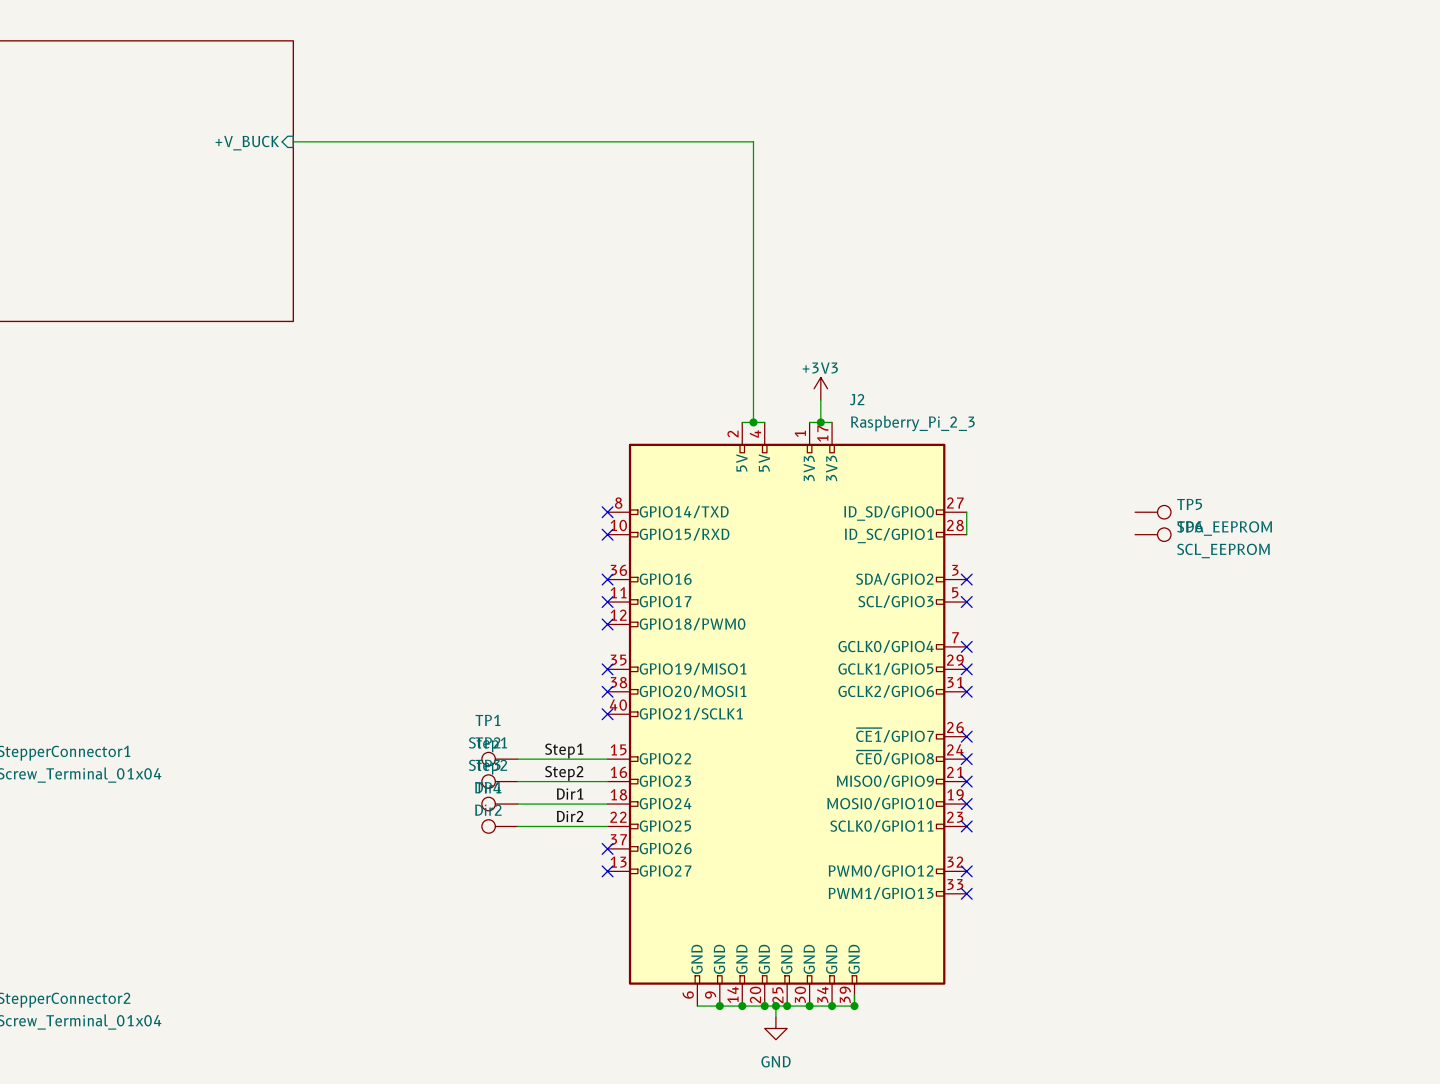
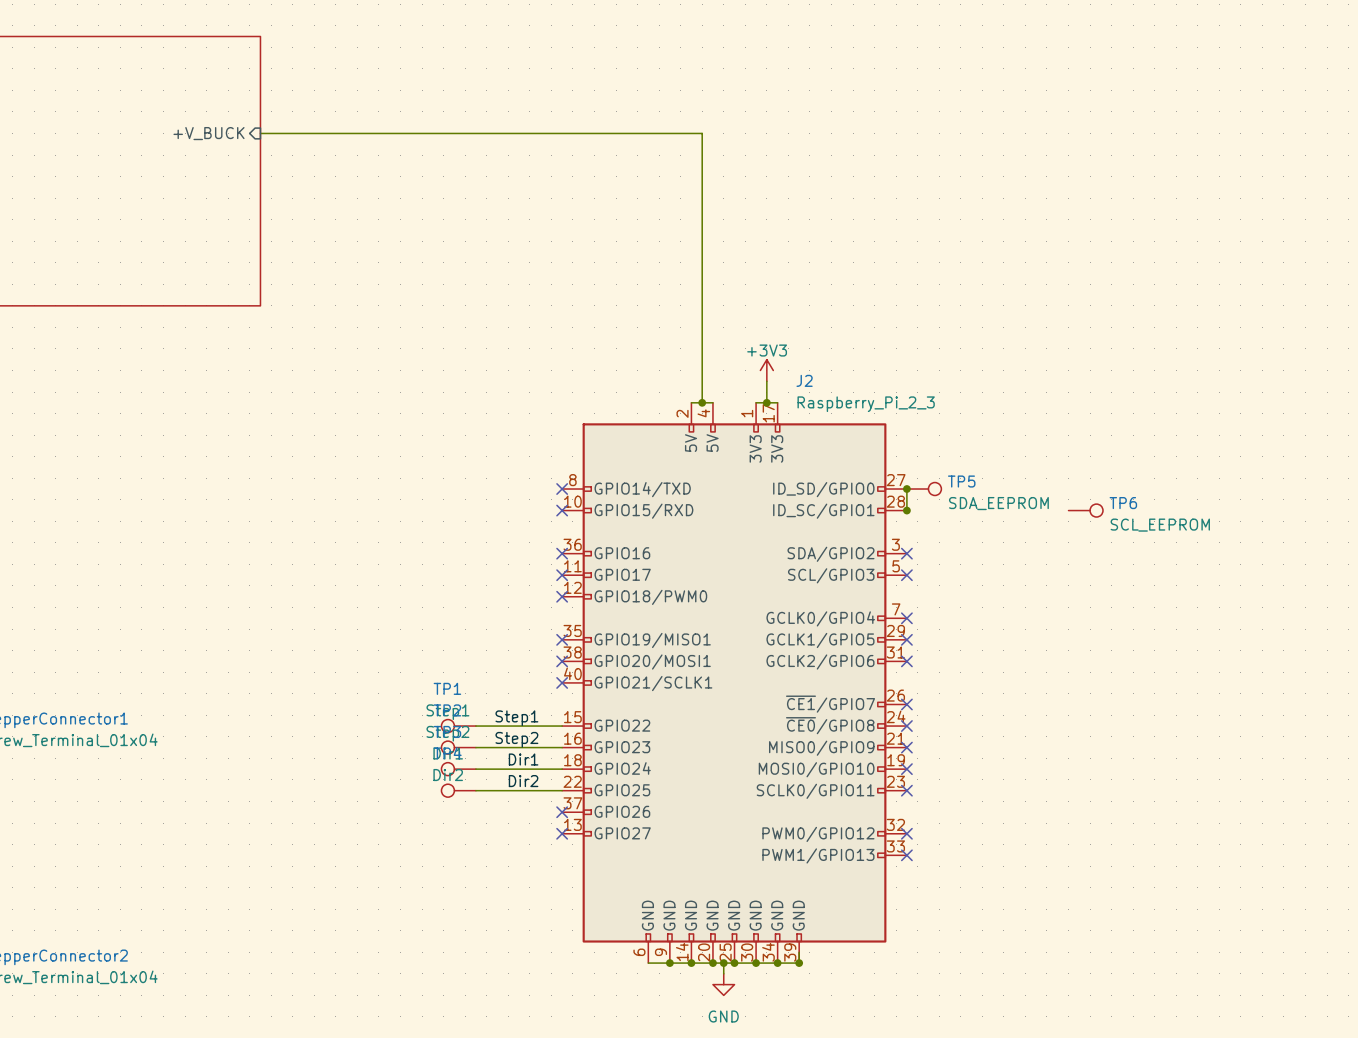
junction: none -> (906, 489)
TP5 position: (1153, 512) -> (924, 489)
junction: none -> (906, 510)

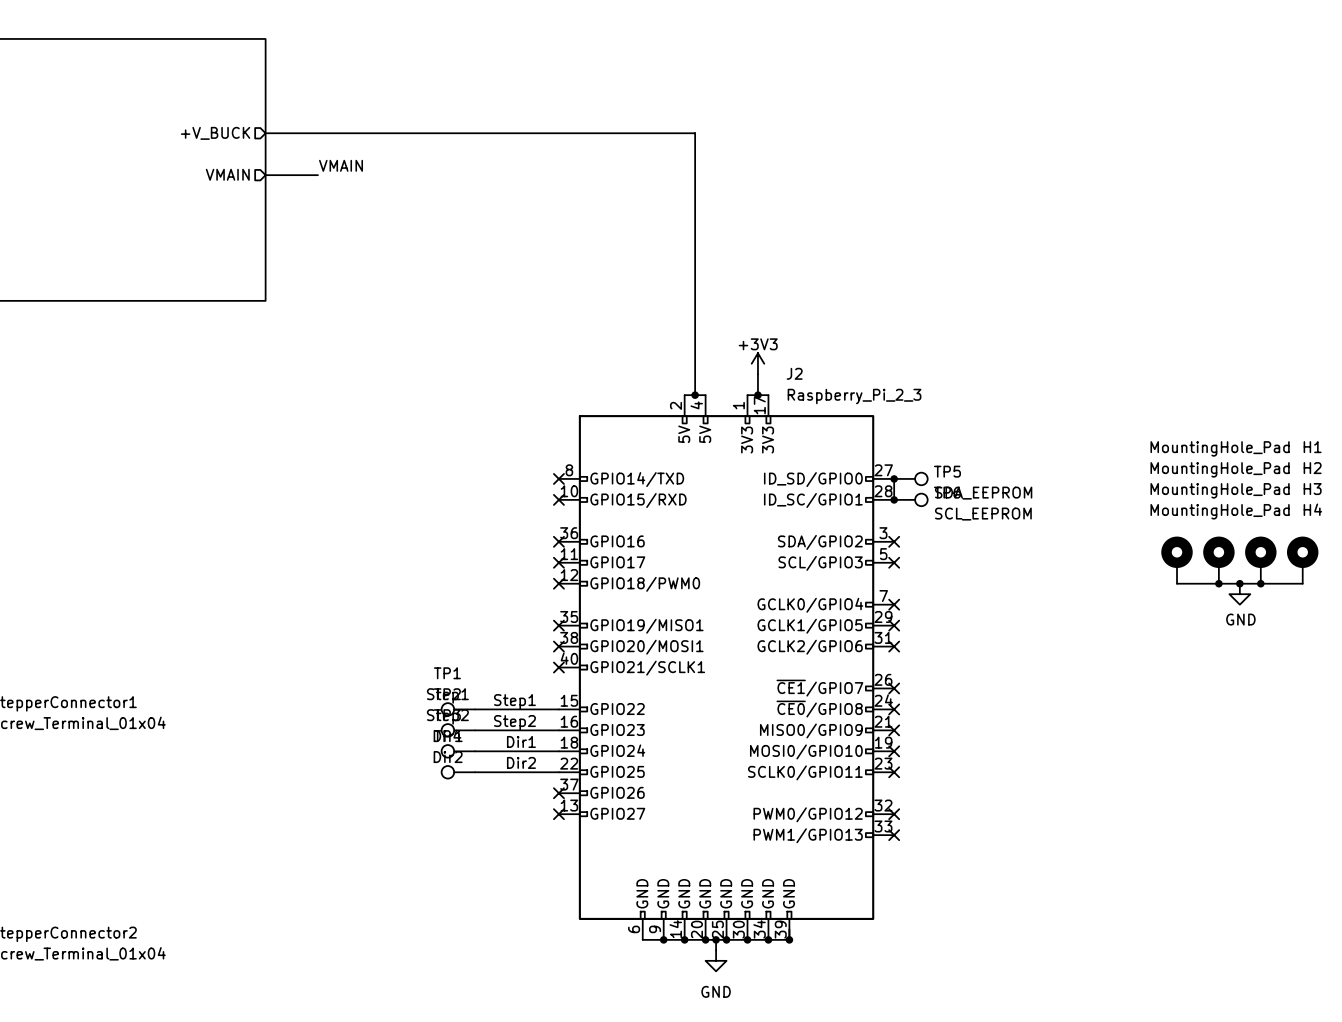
sheet pin shape: input (208, 133) -> output (215, 133)
label: none -> VMAIN (341, 165)
sheet pin: none -> VMAIN (227, 174)
wire: none -> (265, 175) (317, 175)
TP6 position: (1085, 510) -> (910, 499)
H1: none -> MountingHole_Pad (1177, 560)
H2: none -> MountingHole_Pad (1218, 560)
H3: none -> MountingHole_Pad (1260, 560)
H4: none -> MountingHole_Pad (1302, 560)
wire: none -> (1177, 583) (1302, 583)
junction: none -> (1218, 583)
junction: none -> (1239, 583)
junction: none -> (1260, 583)
power symbol: none -> GND (1239, 594)

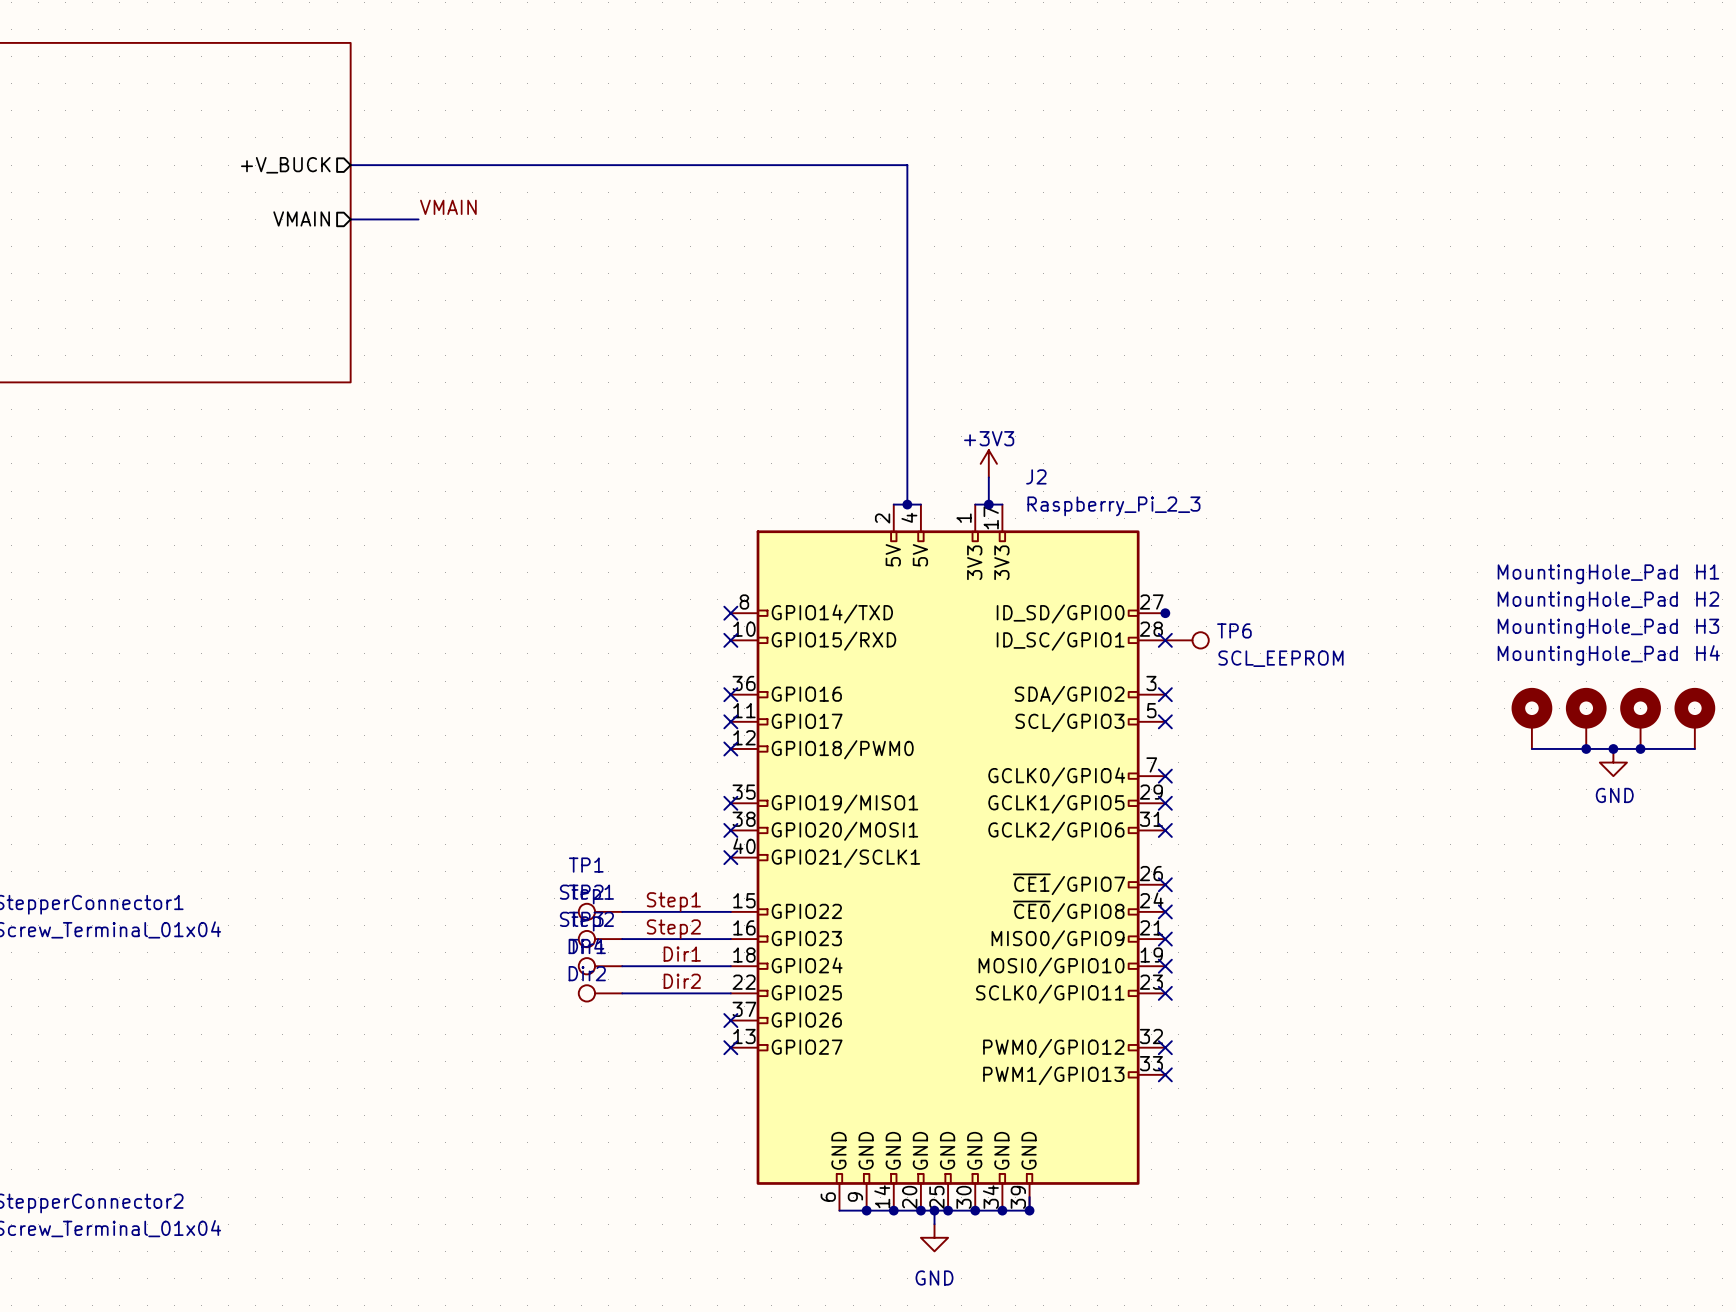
wire: (894, 478) (894, 499) -> none
TP5: SDA_EEPROM (910, 478) -> none
junction: (894, 499) -> none
no-connect mark: none -> (1165, 640)

